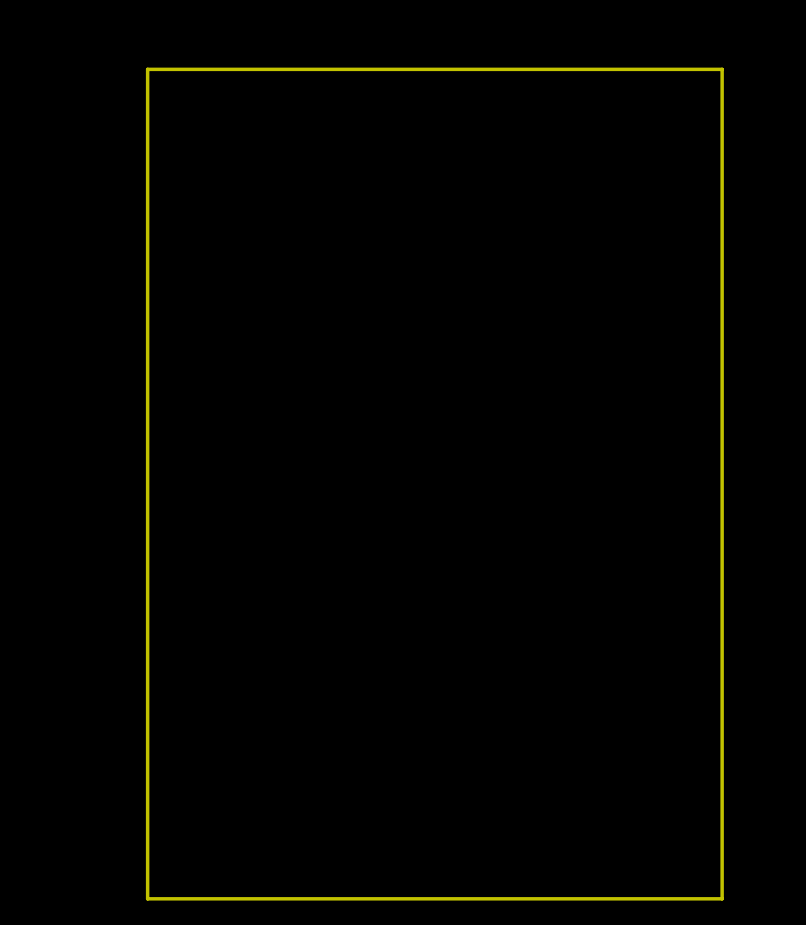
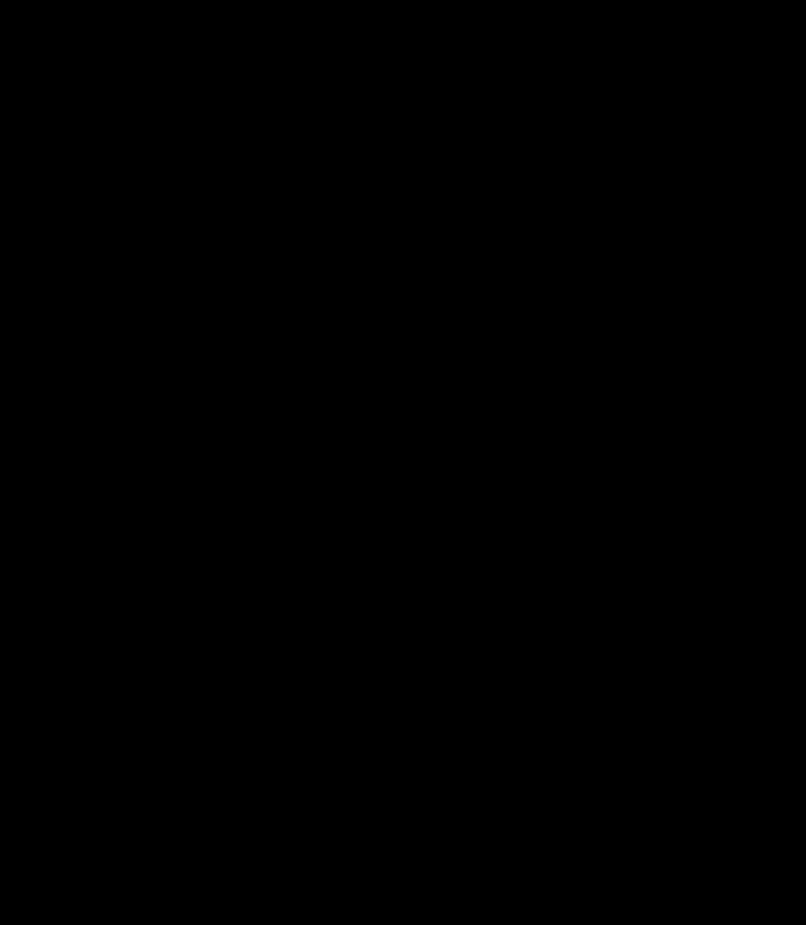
board edge: (722, 69) (147, 69) (147, 898) (722, 898) (722, 69) -> none

